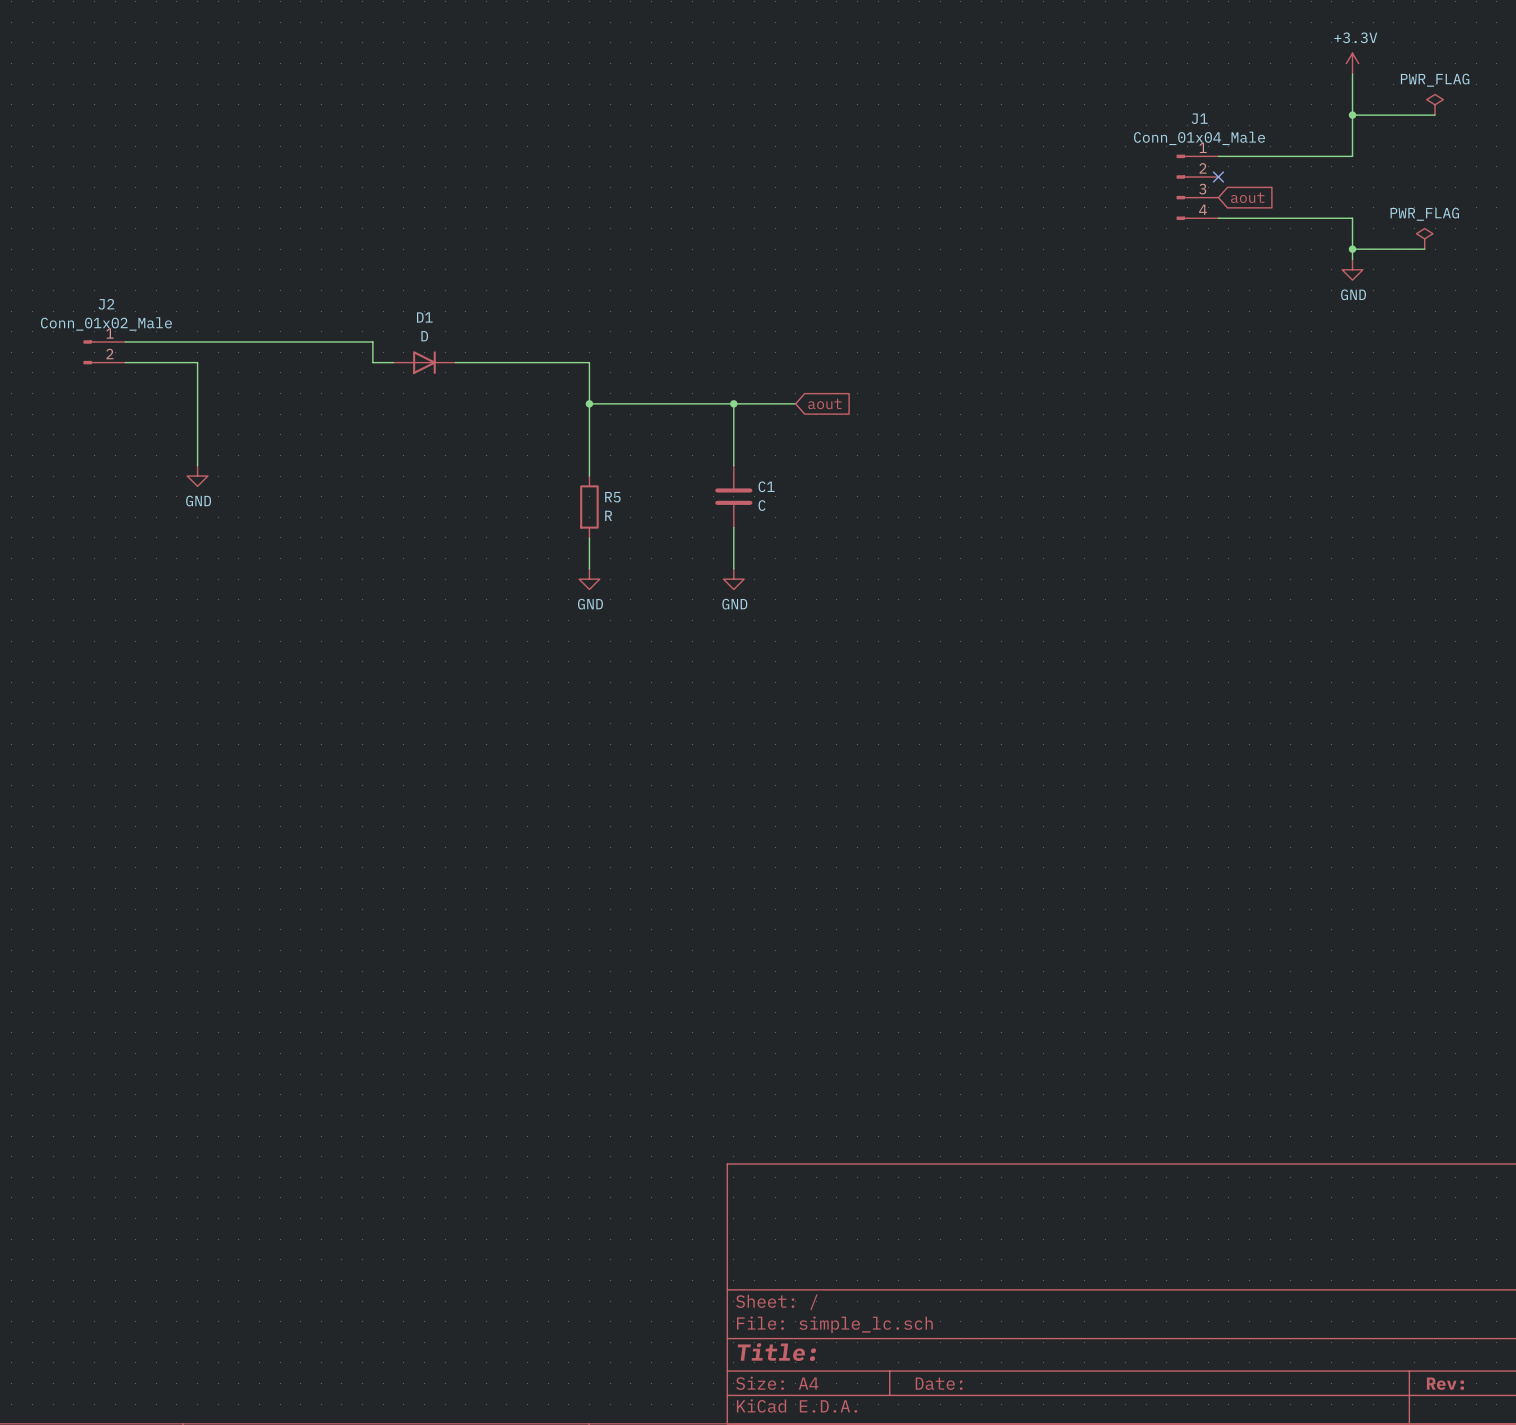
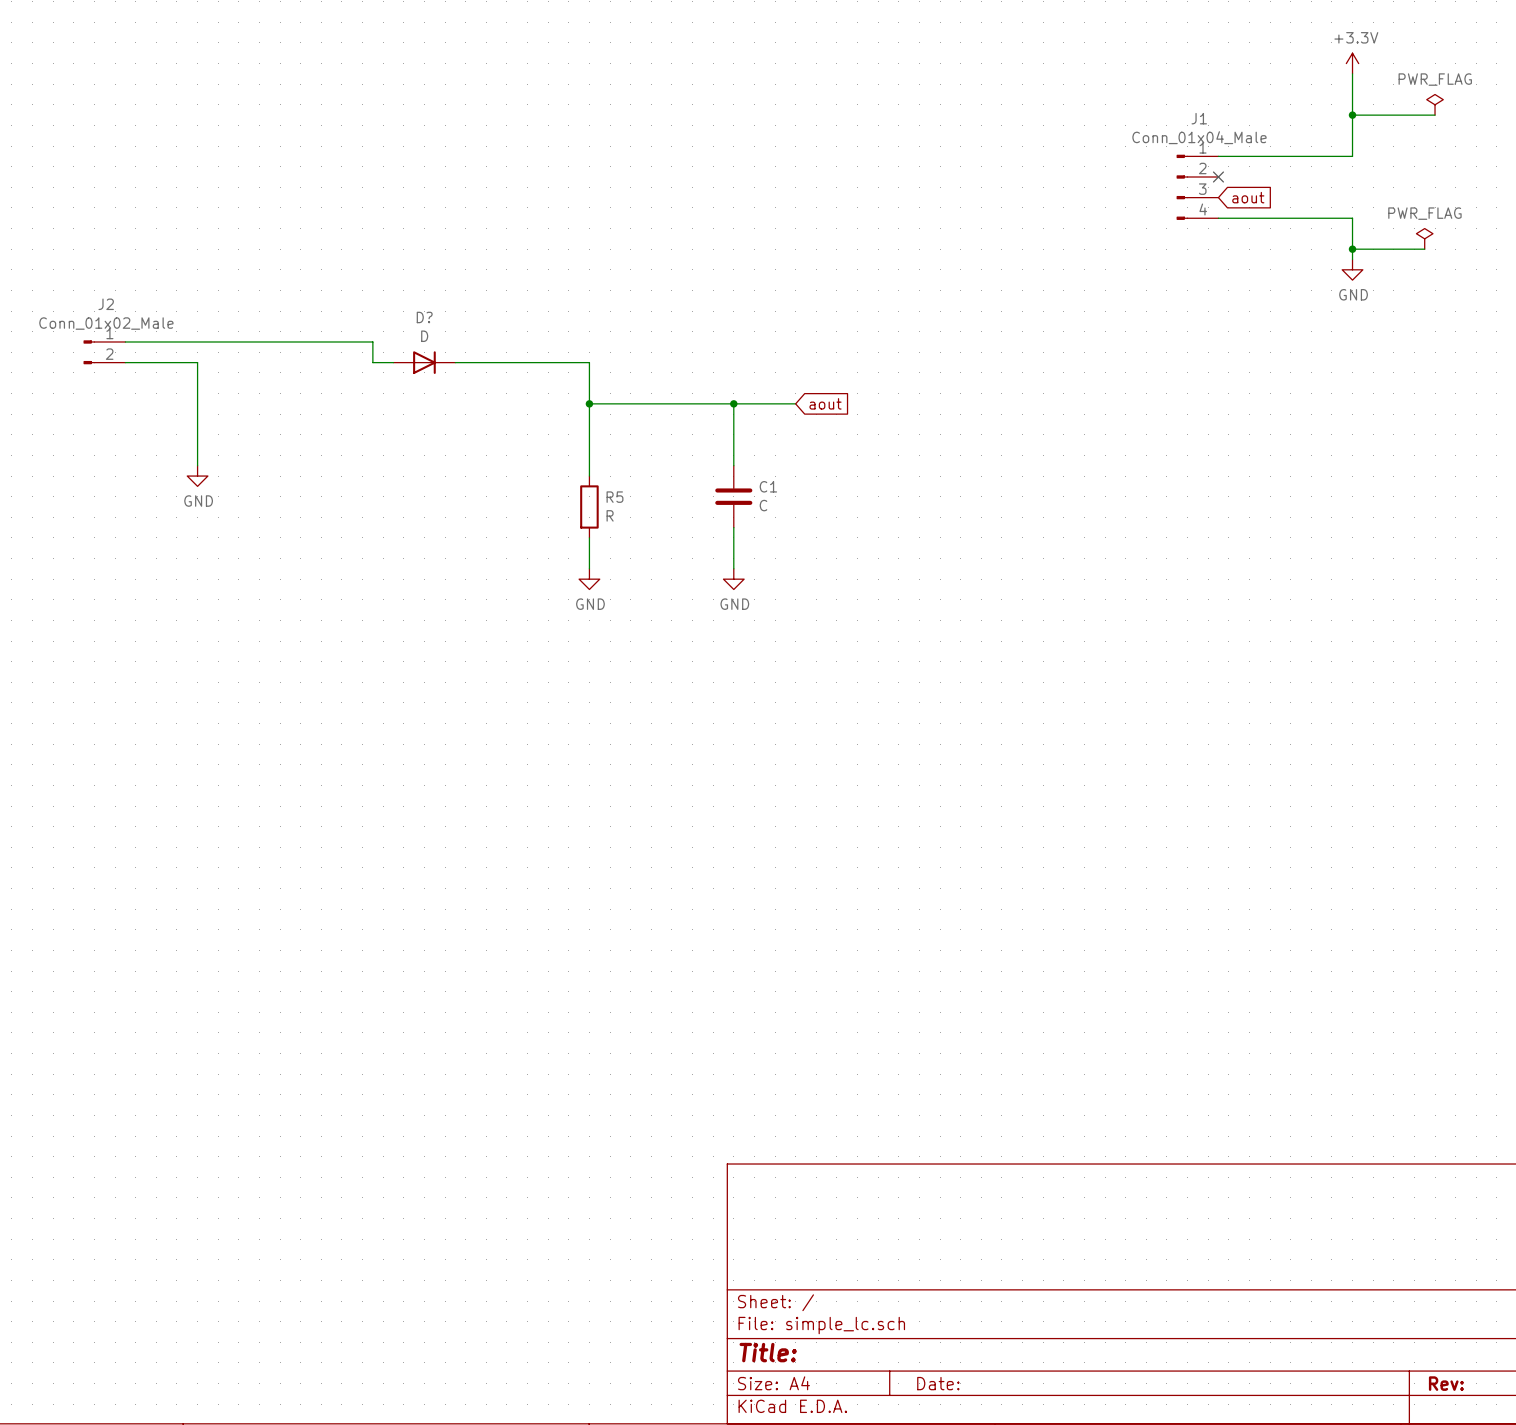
D1 name: D1 (424, 317) -> D? (424, 317)

